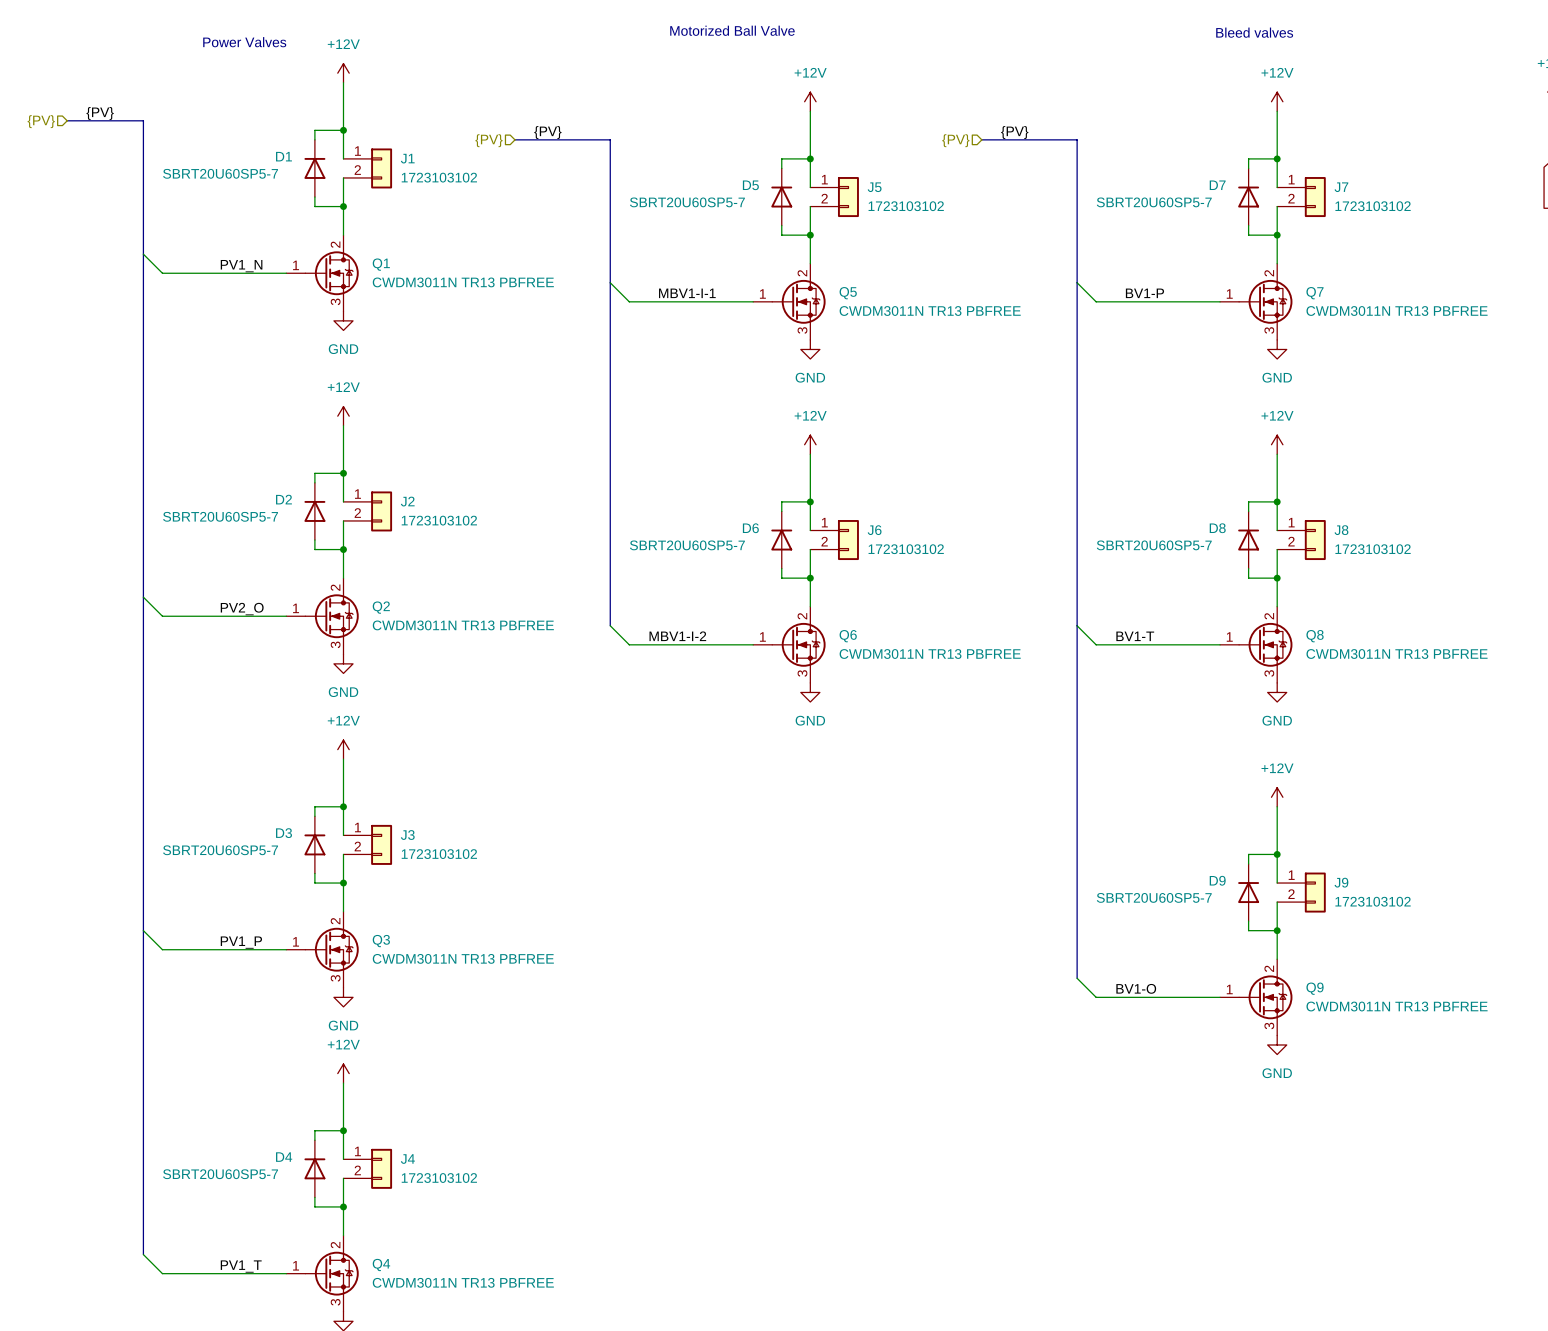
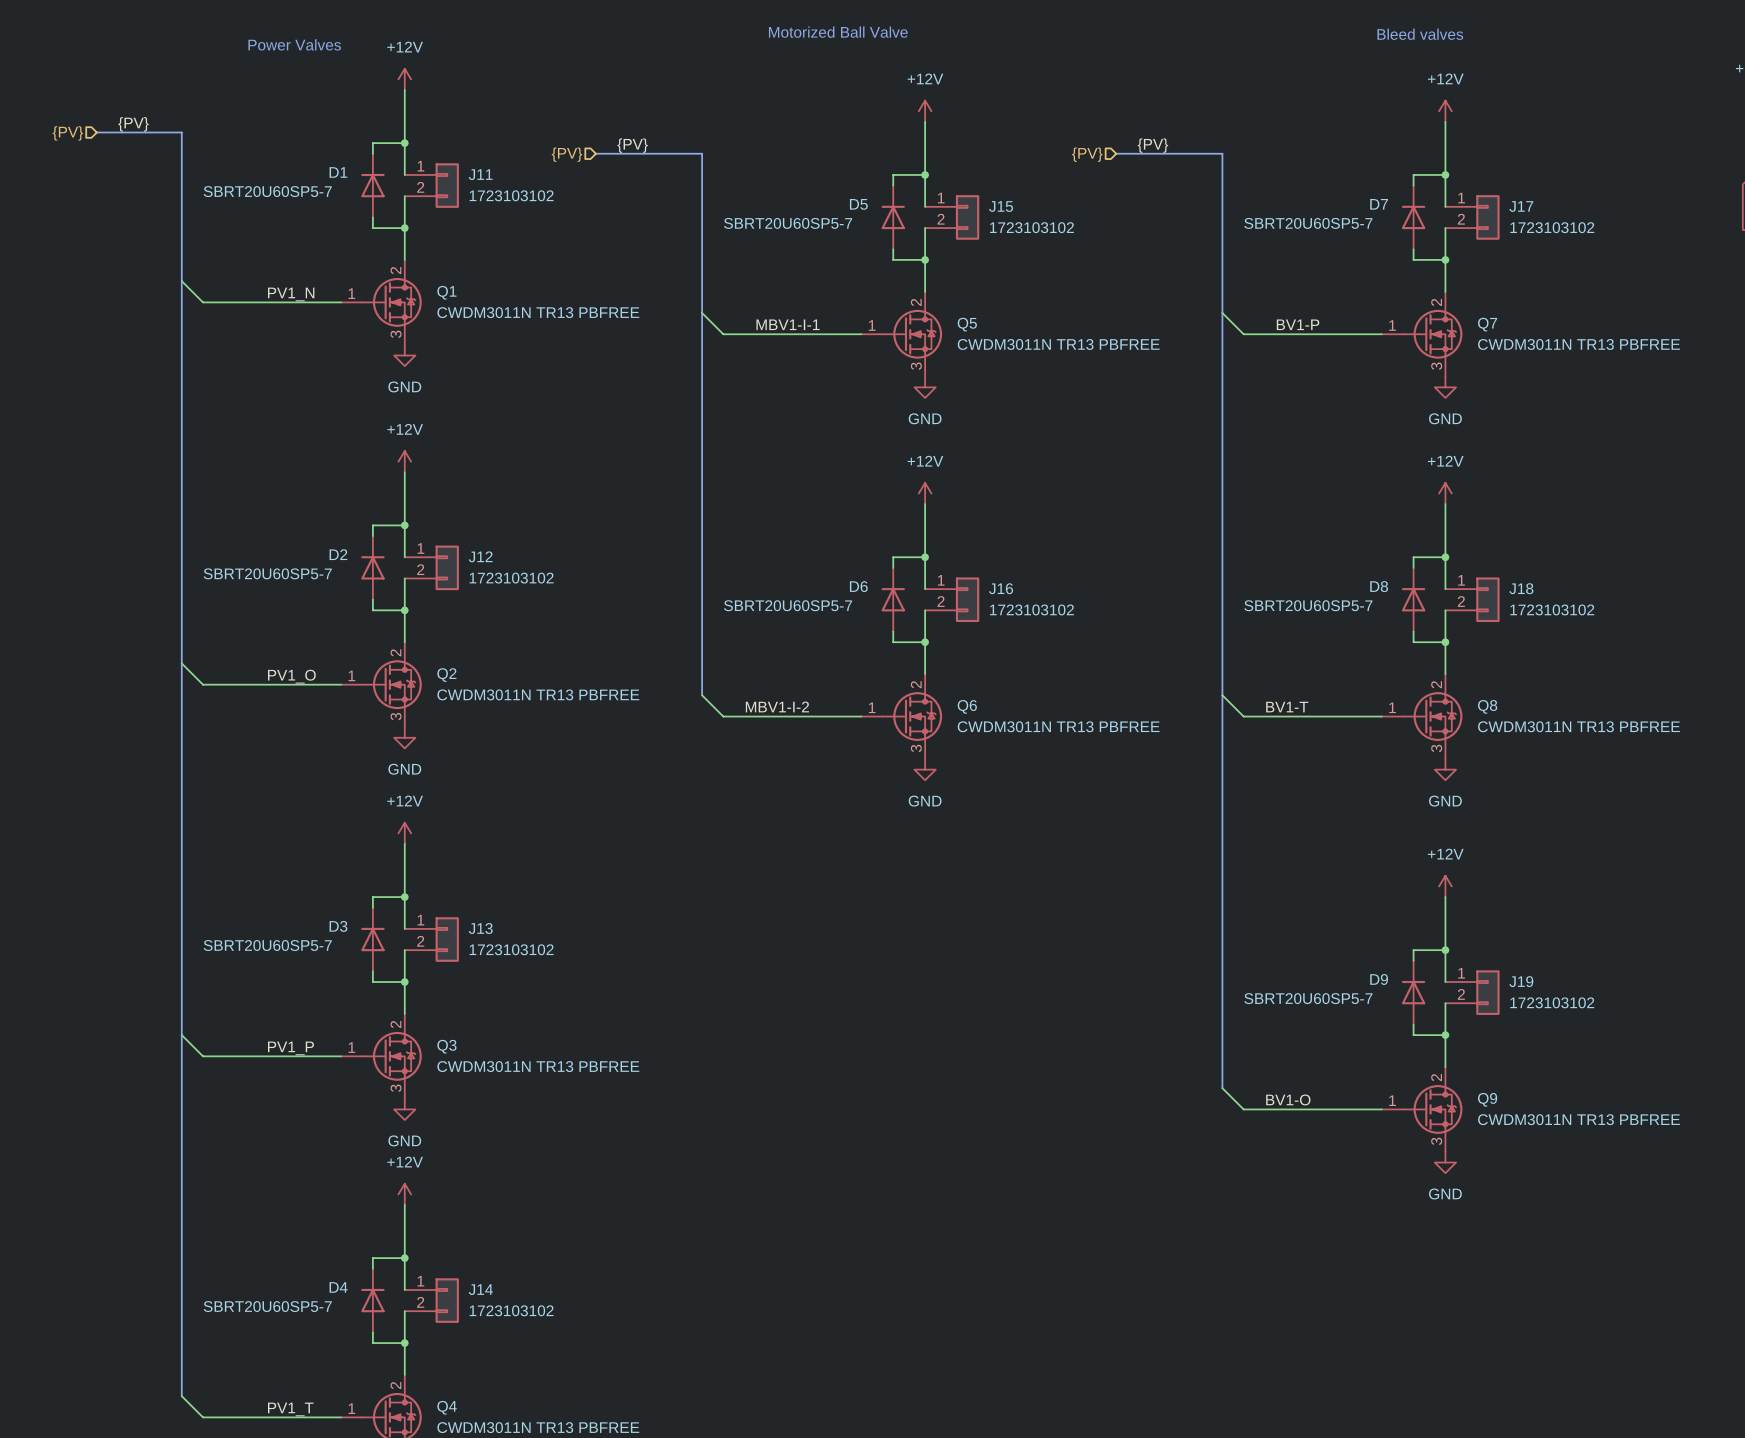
J1 name: J1 (407, 158) -> J11 (480, 174)
J5 name: J5 (874, 187) -> J15 (1001, 206)
J7 name: J7 (1341, 187) -> J17 (1521, 206)
J2 name: J2 (407, 501) -> J12 (480, 556)
J6 name: J6 (874, 530) -> J16 (1001, 588)
J8 name: J8 (1341, 530) -> J18 (1521, 588)
label: PV2_O (242, 609) -> PV1_O (291, 676)
J3 name: J3 (407, 835) -> J13 (480, 928)
J9 name: J9 (1341, 882) -> J19 (1521, 981)
J4 name: J4 (407, 1159) -> J14 (480, 1289)

